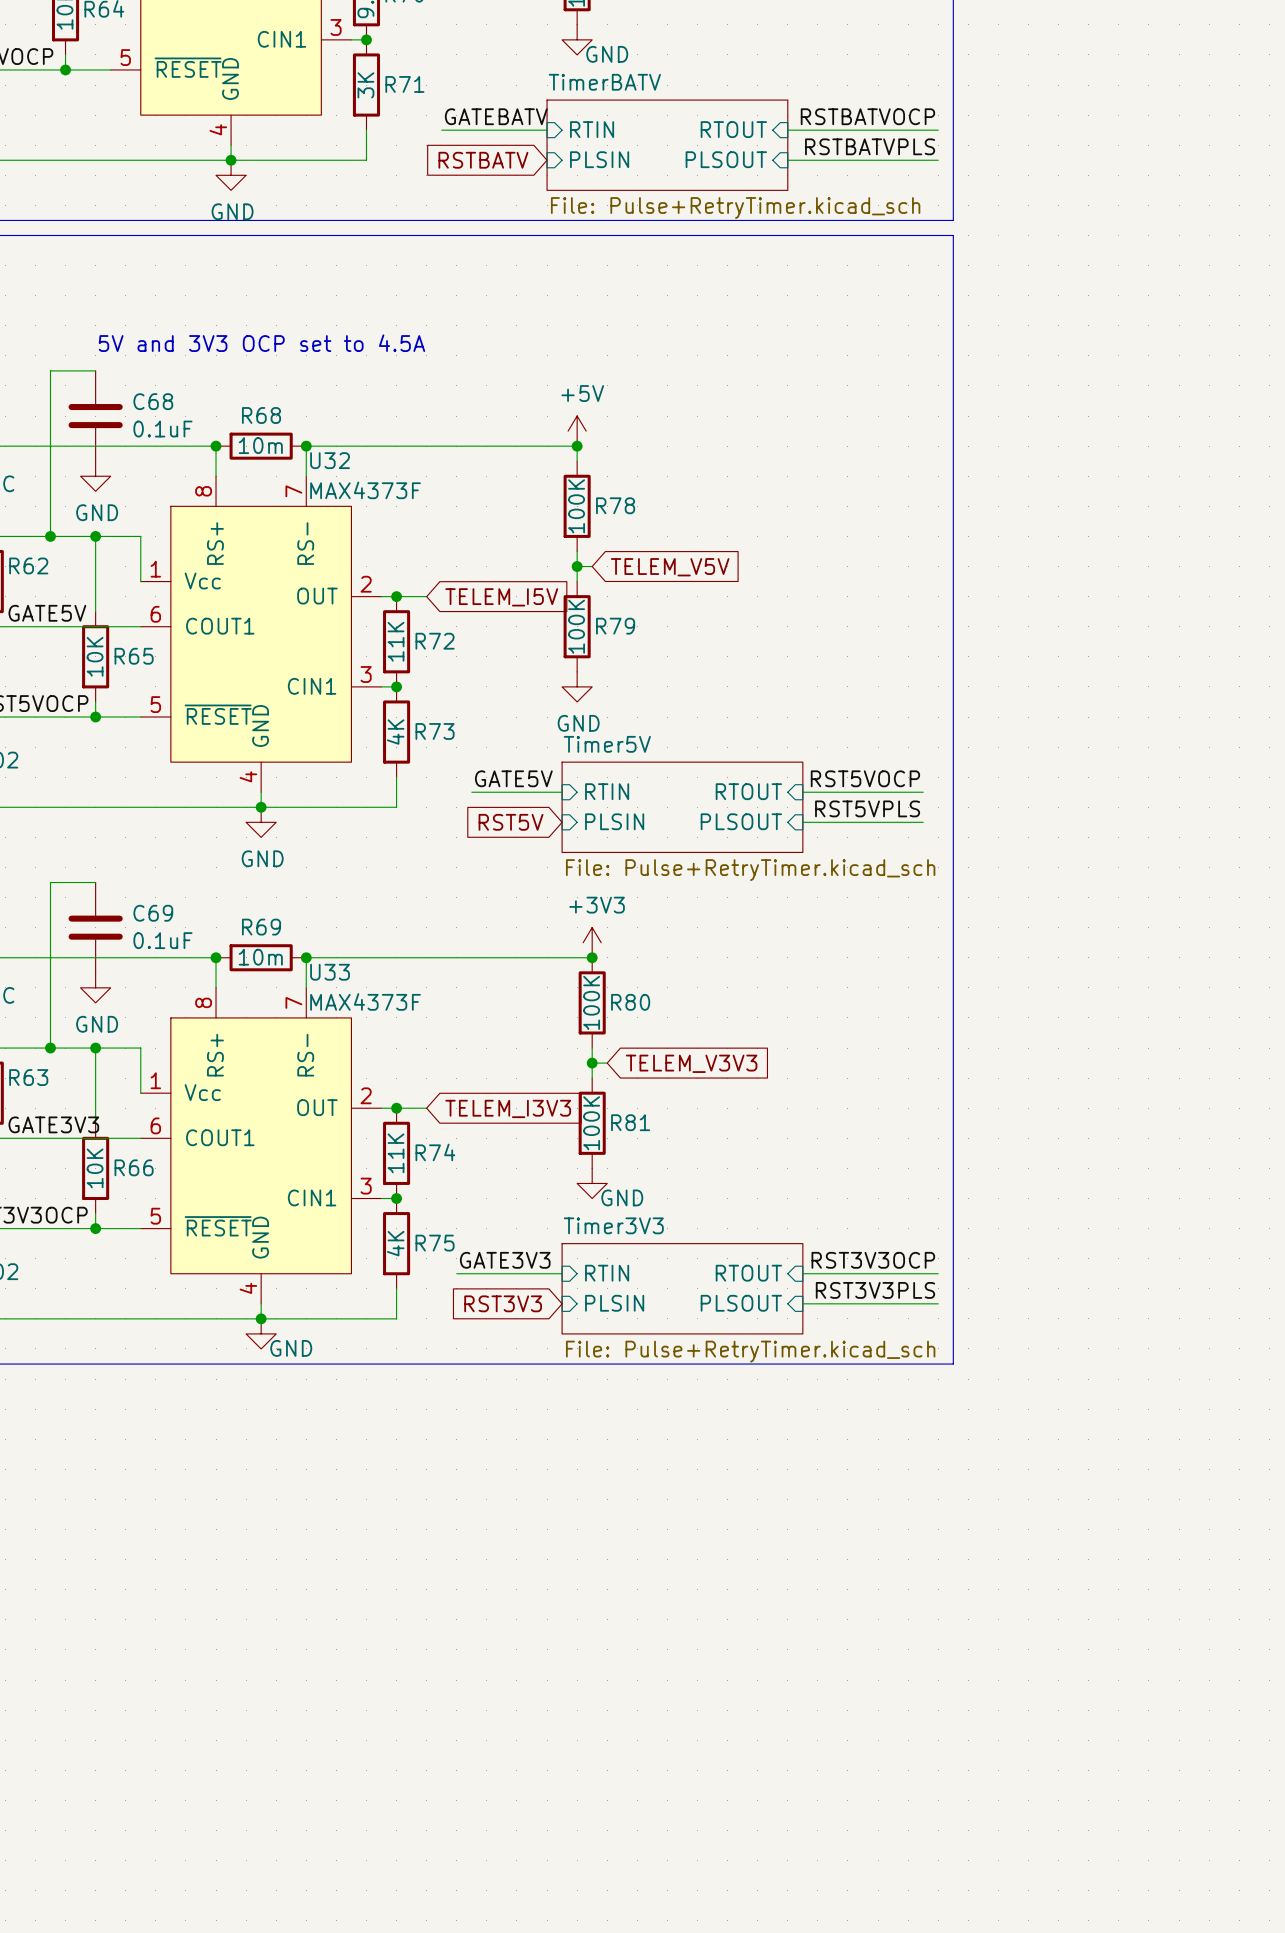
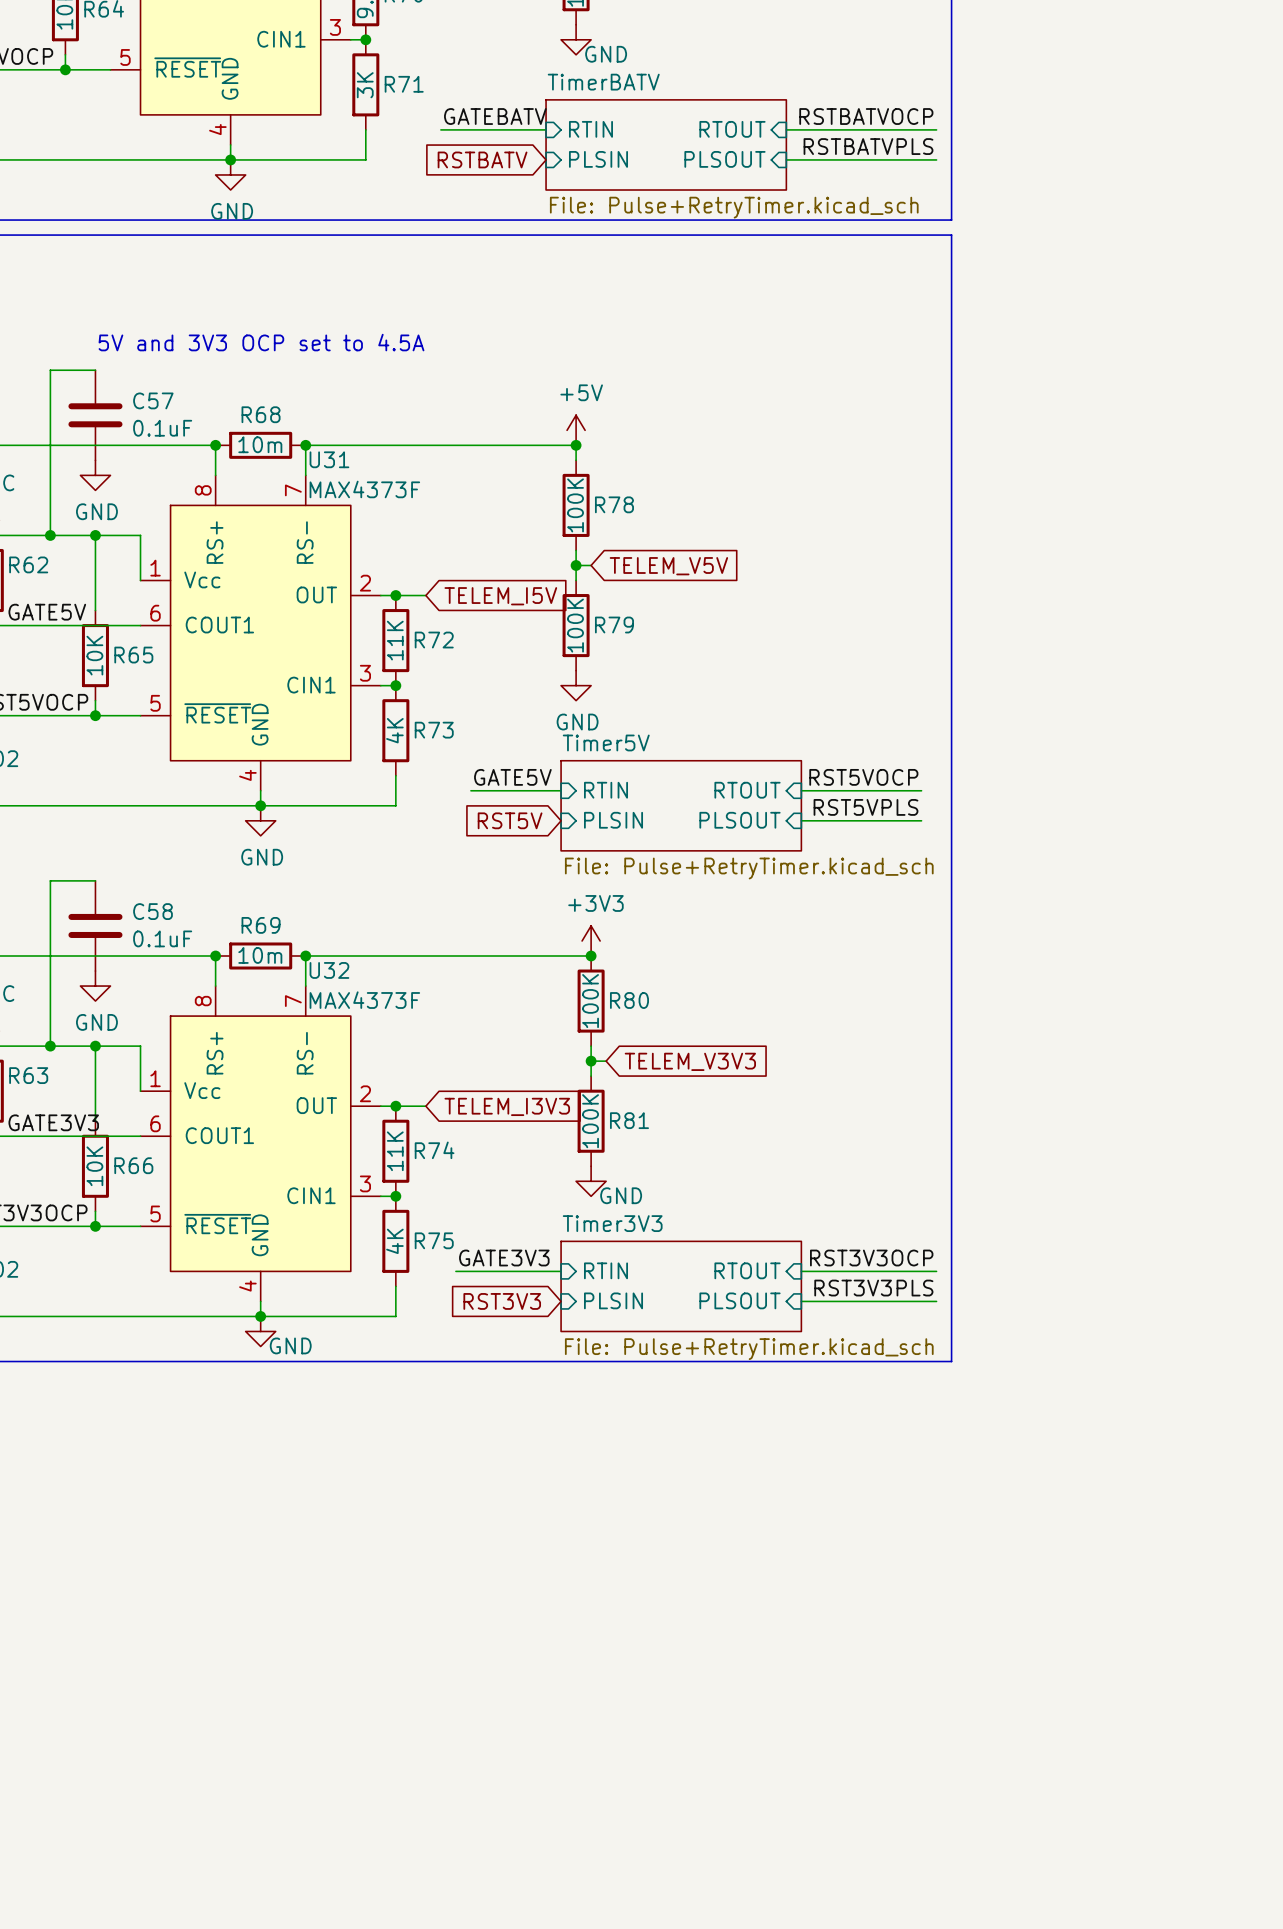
C68 name: C68 (153, 401) -> C57 (153, 400)
U32 name: U32 (330, 460) -> U31 (329, 459)
C69 name: C69 (153, 913) -> C58 (153, 911)
U33 name: U33 (330, 972) -> U32 (329, 970)

